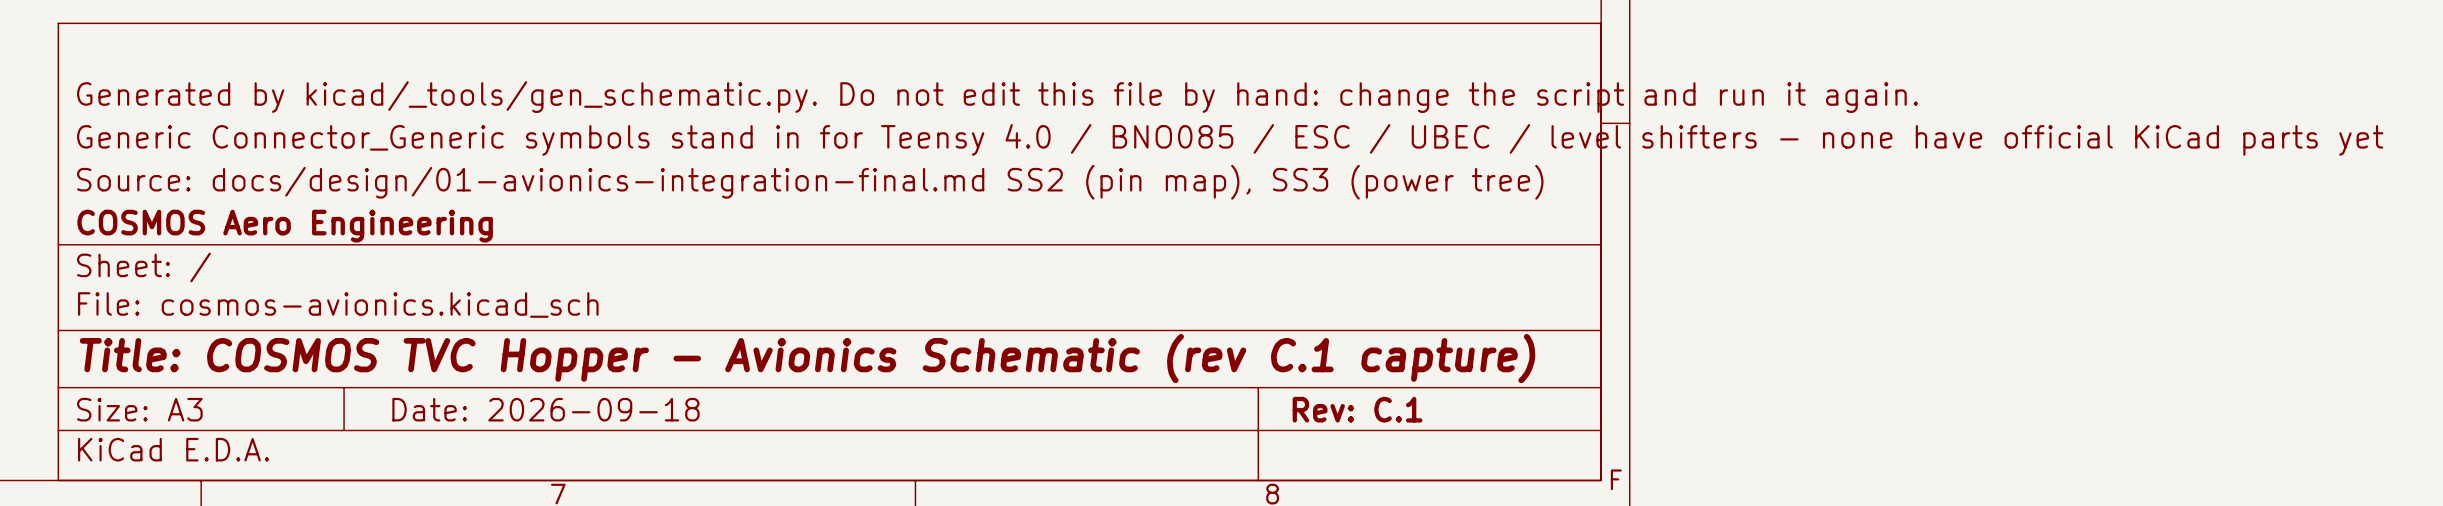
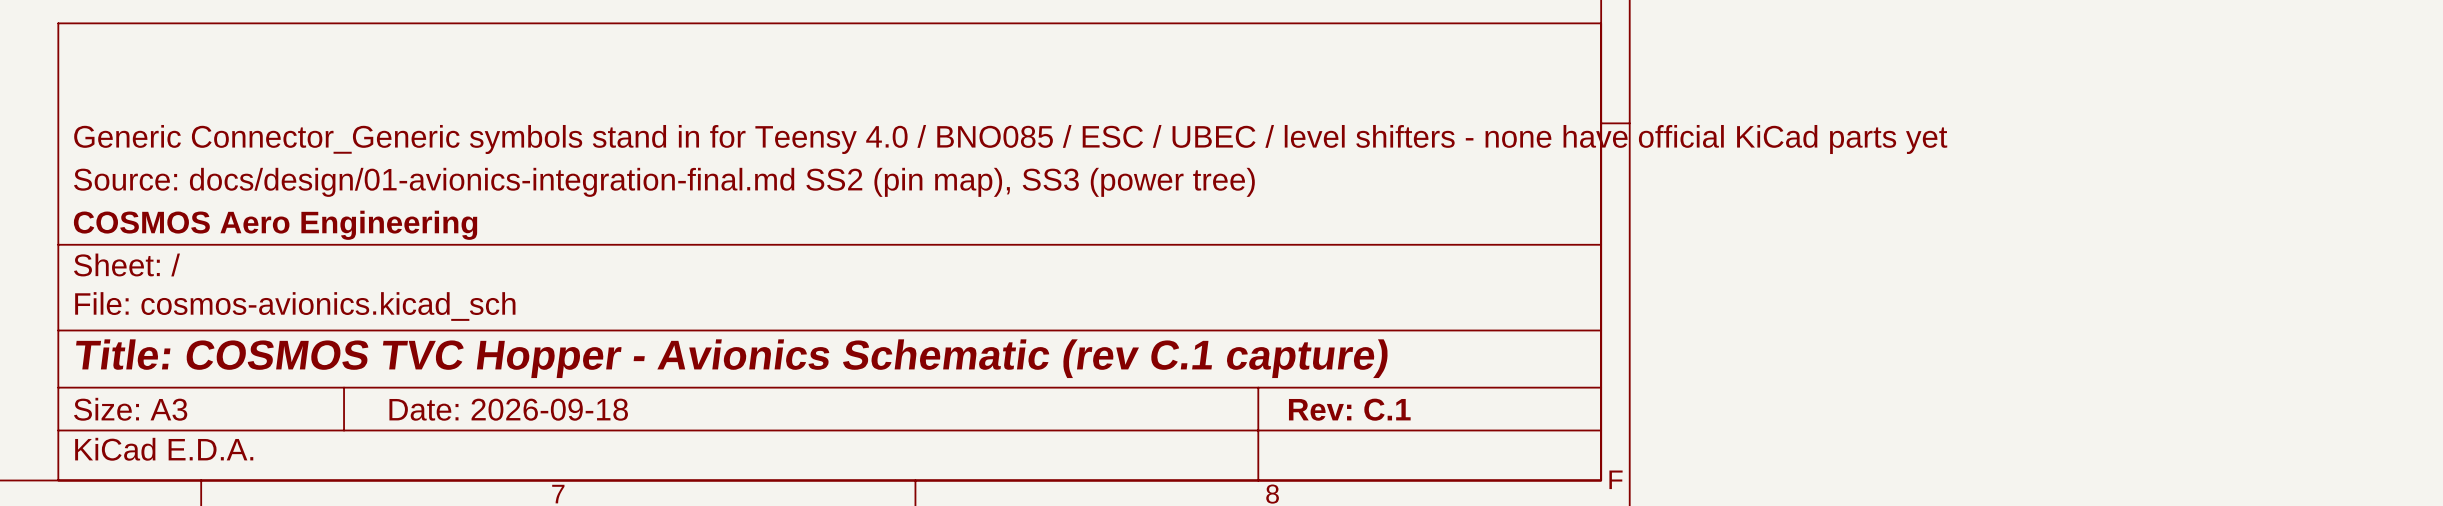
title block: Generated by kicad/_tools/gen_schematic.py. Do not edit this file by hand: change the script and run it again. (997, 97) -> none

